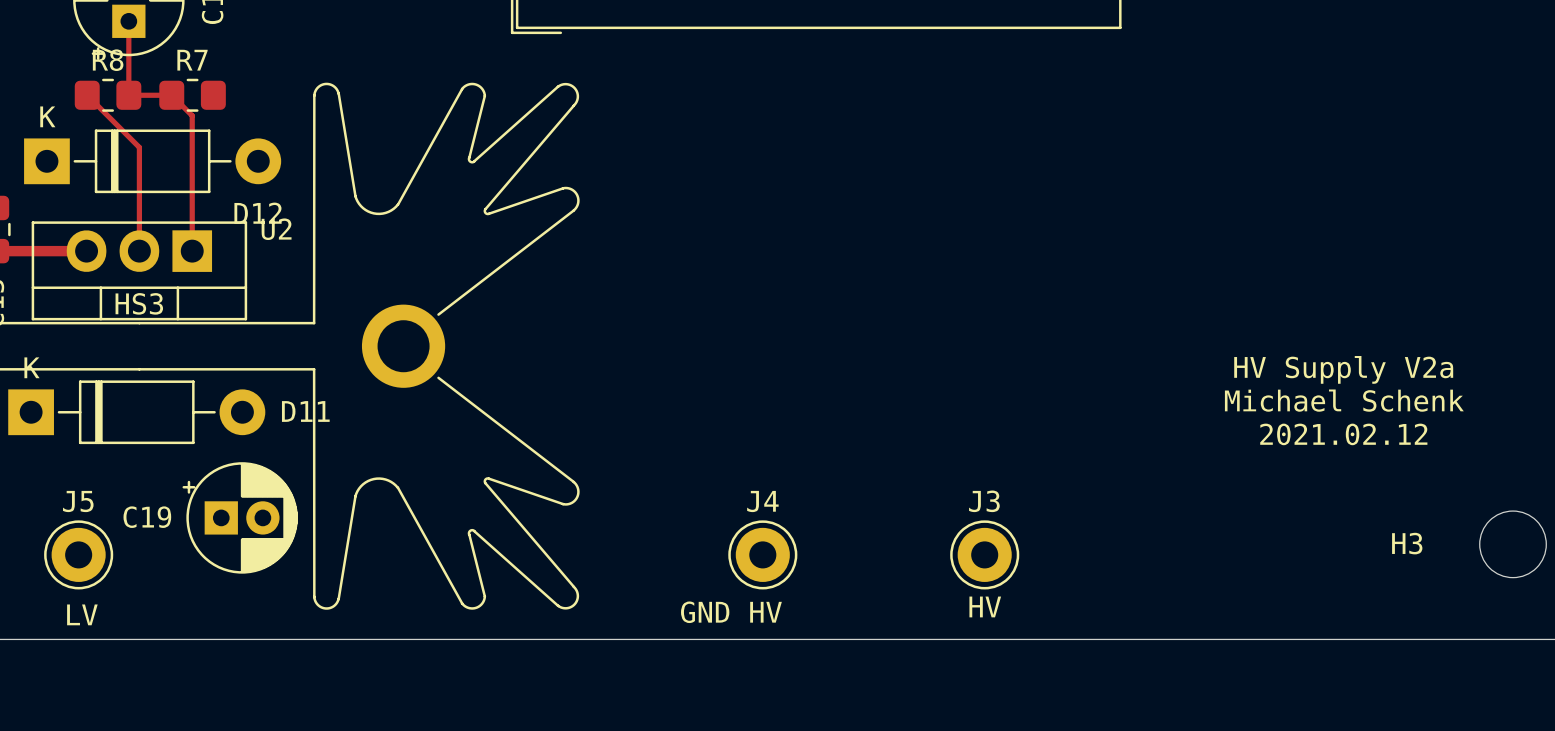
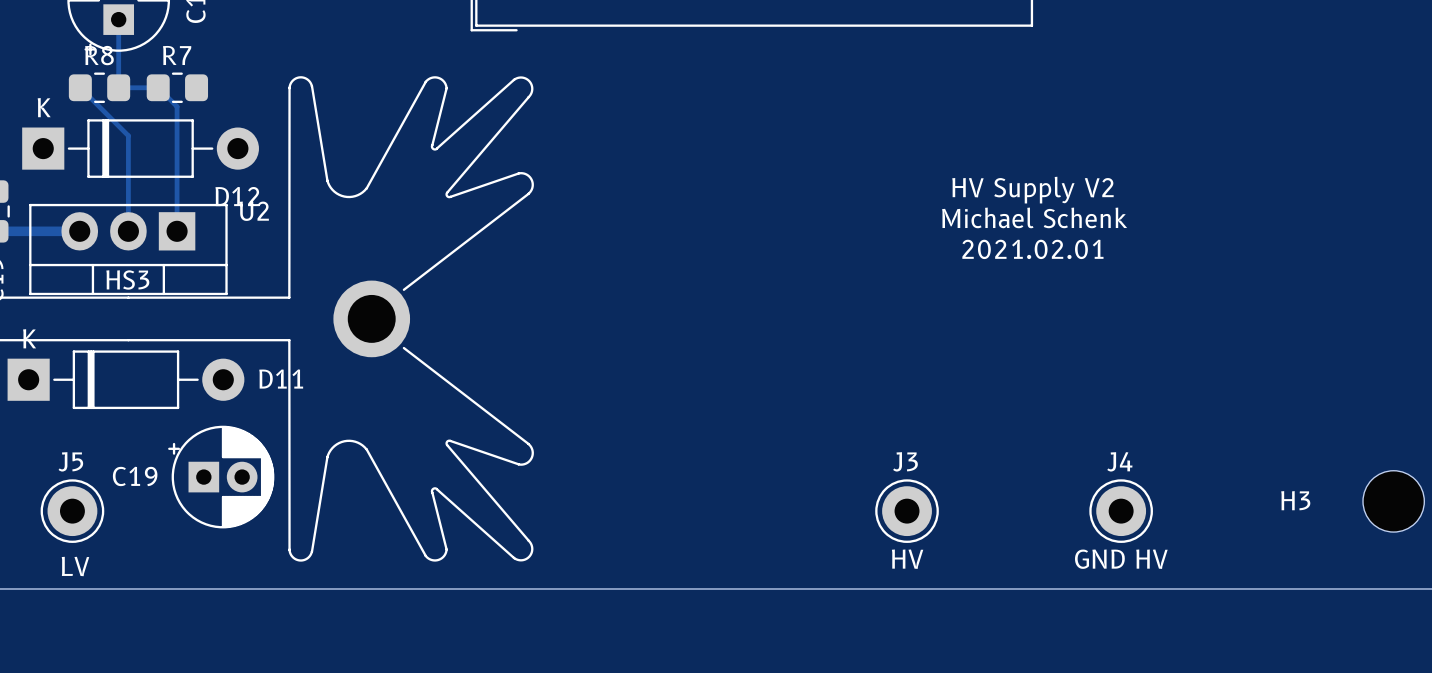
text: none -> HV Supply V2 (1032, 190)
text: none -> 2021.02.01 (1032, 249)
text: HV Supply V2a (1343, 369) -> none
text position: Michael Schenk (1344, 400) -> Michael Schenk (1034, 217)
text: 2021.02.12 (1343, 434) -> none
J4 position: (762, 554) -> (1121, 511)
text position: GND HV (731, 612) -> GND HV (1121, 559)

